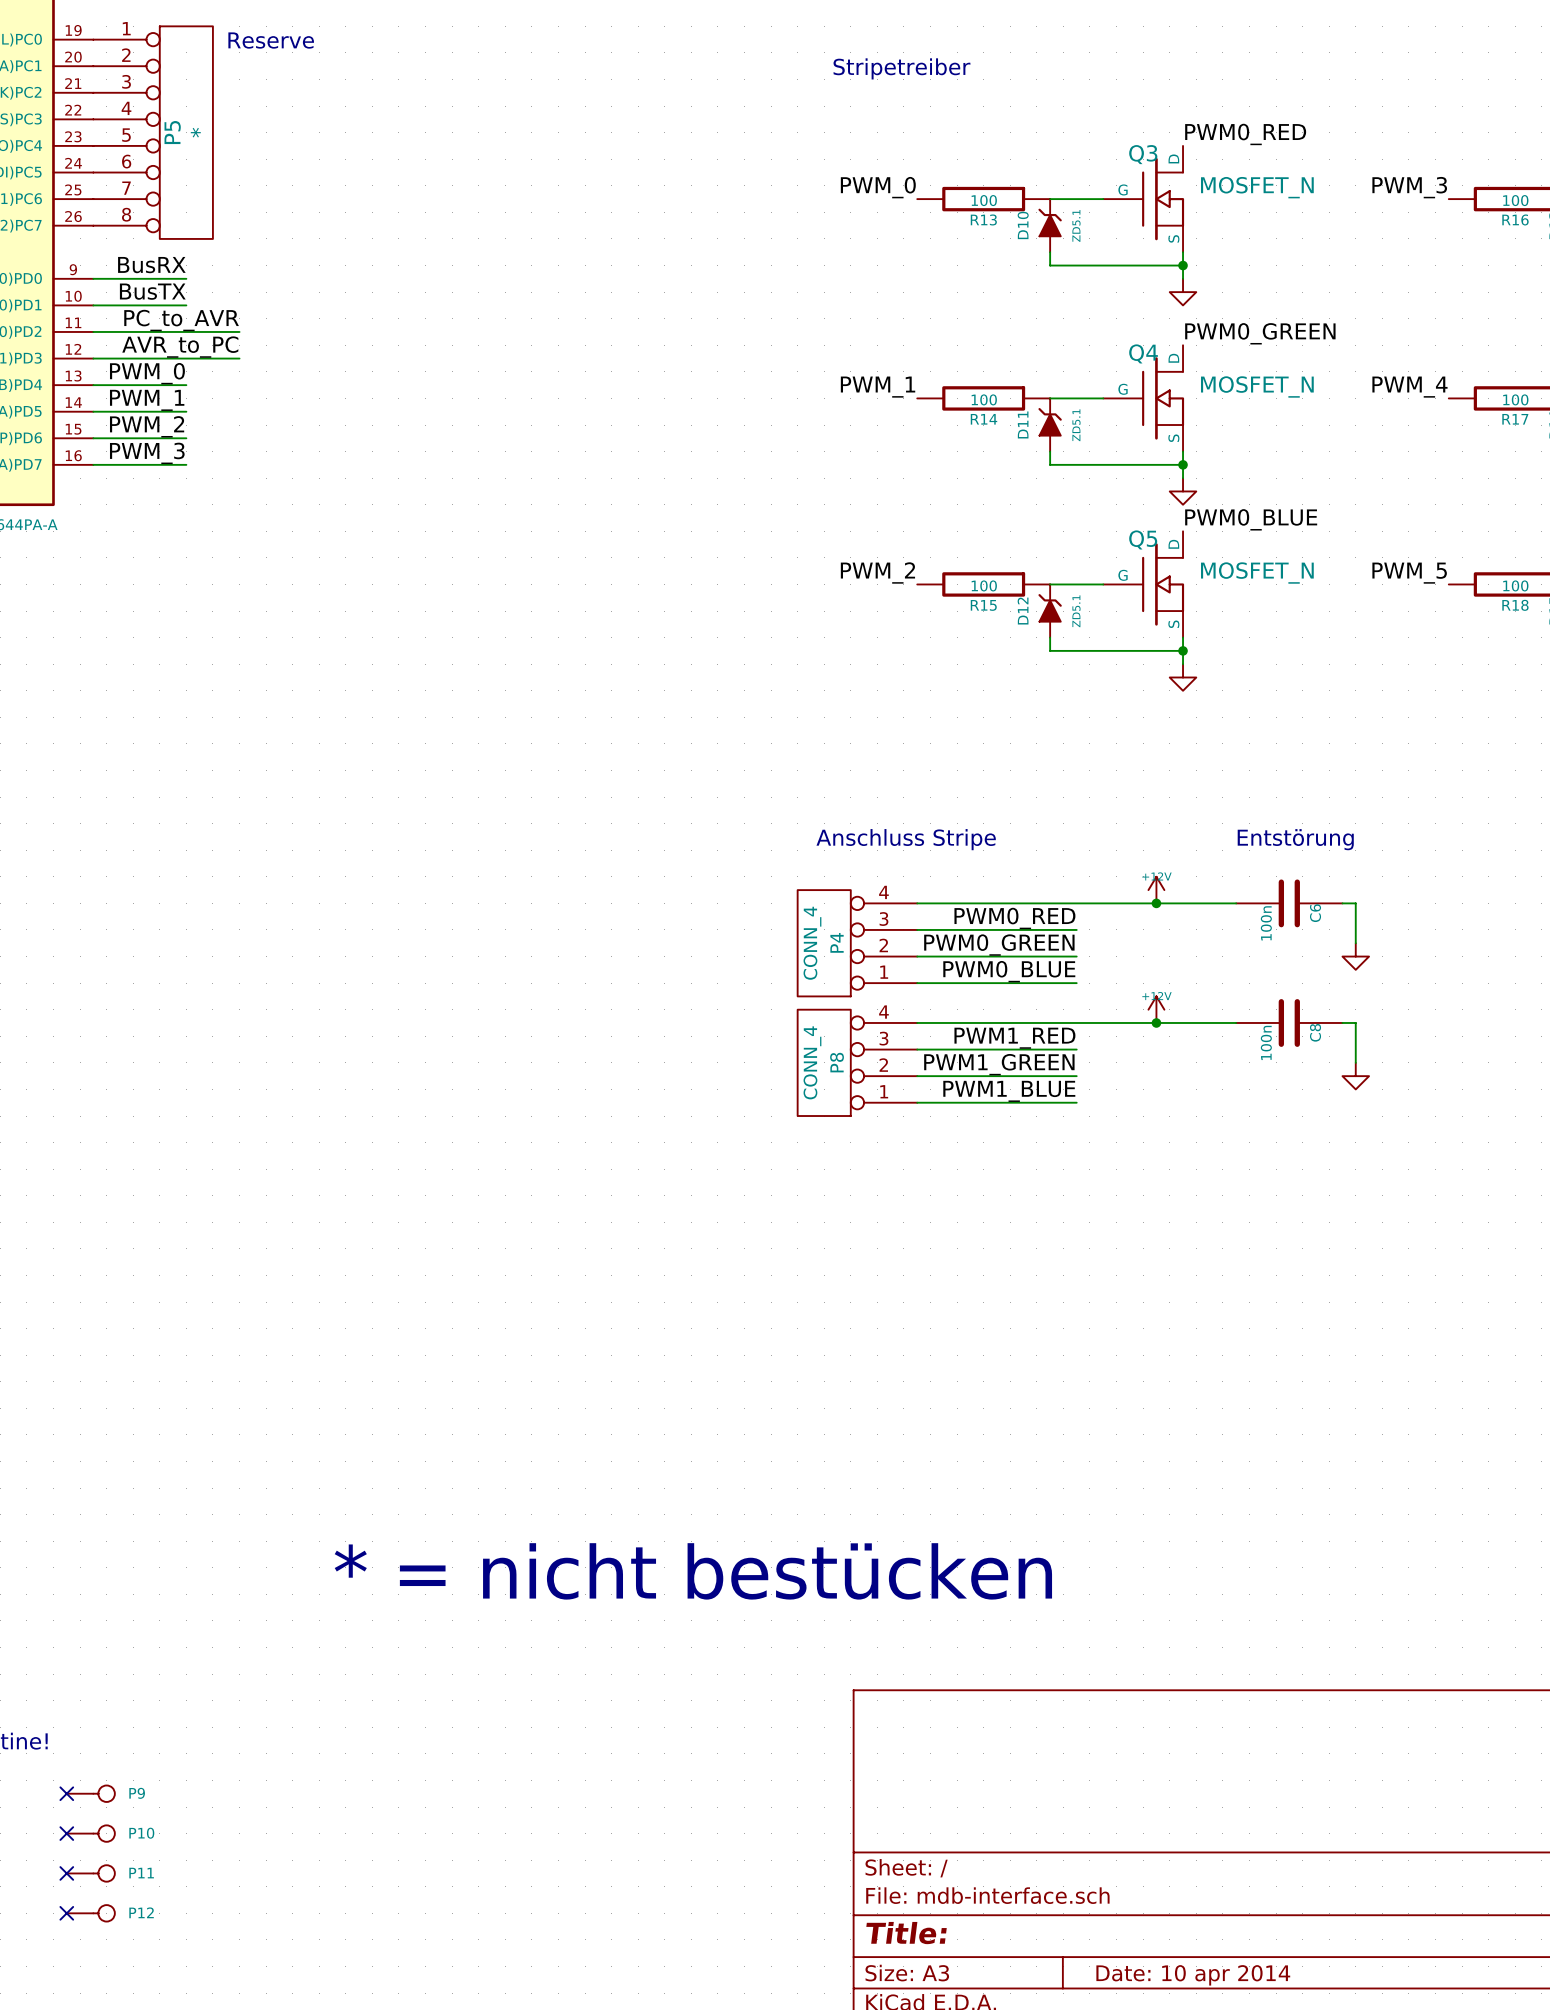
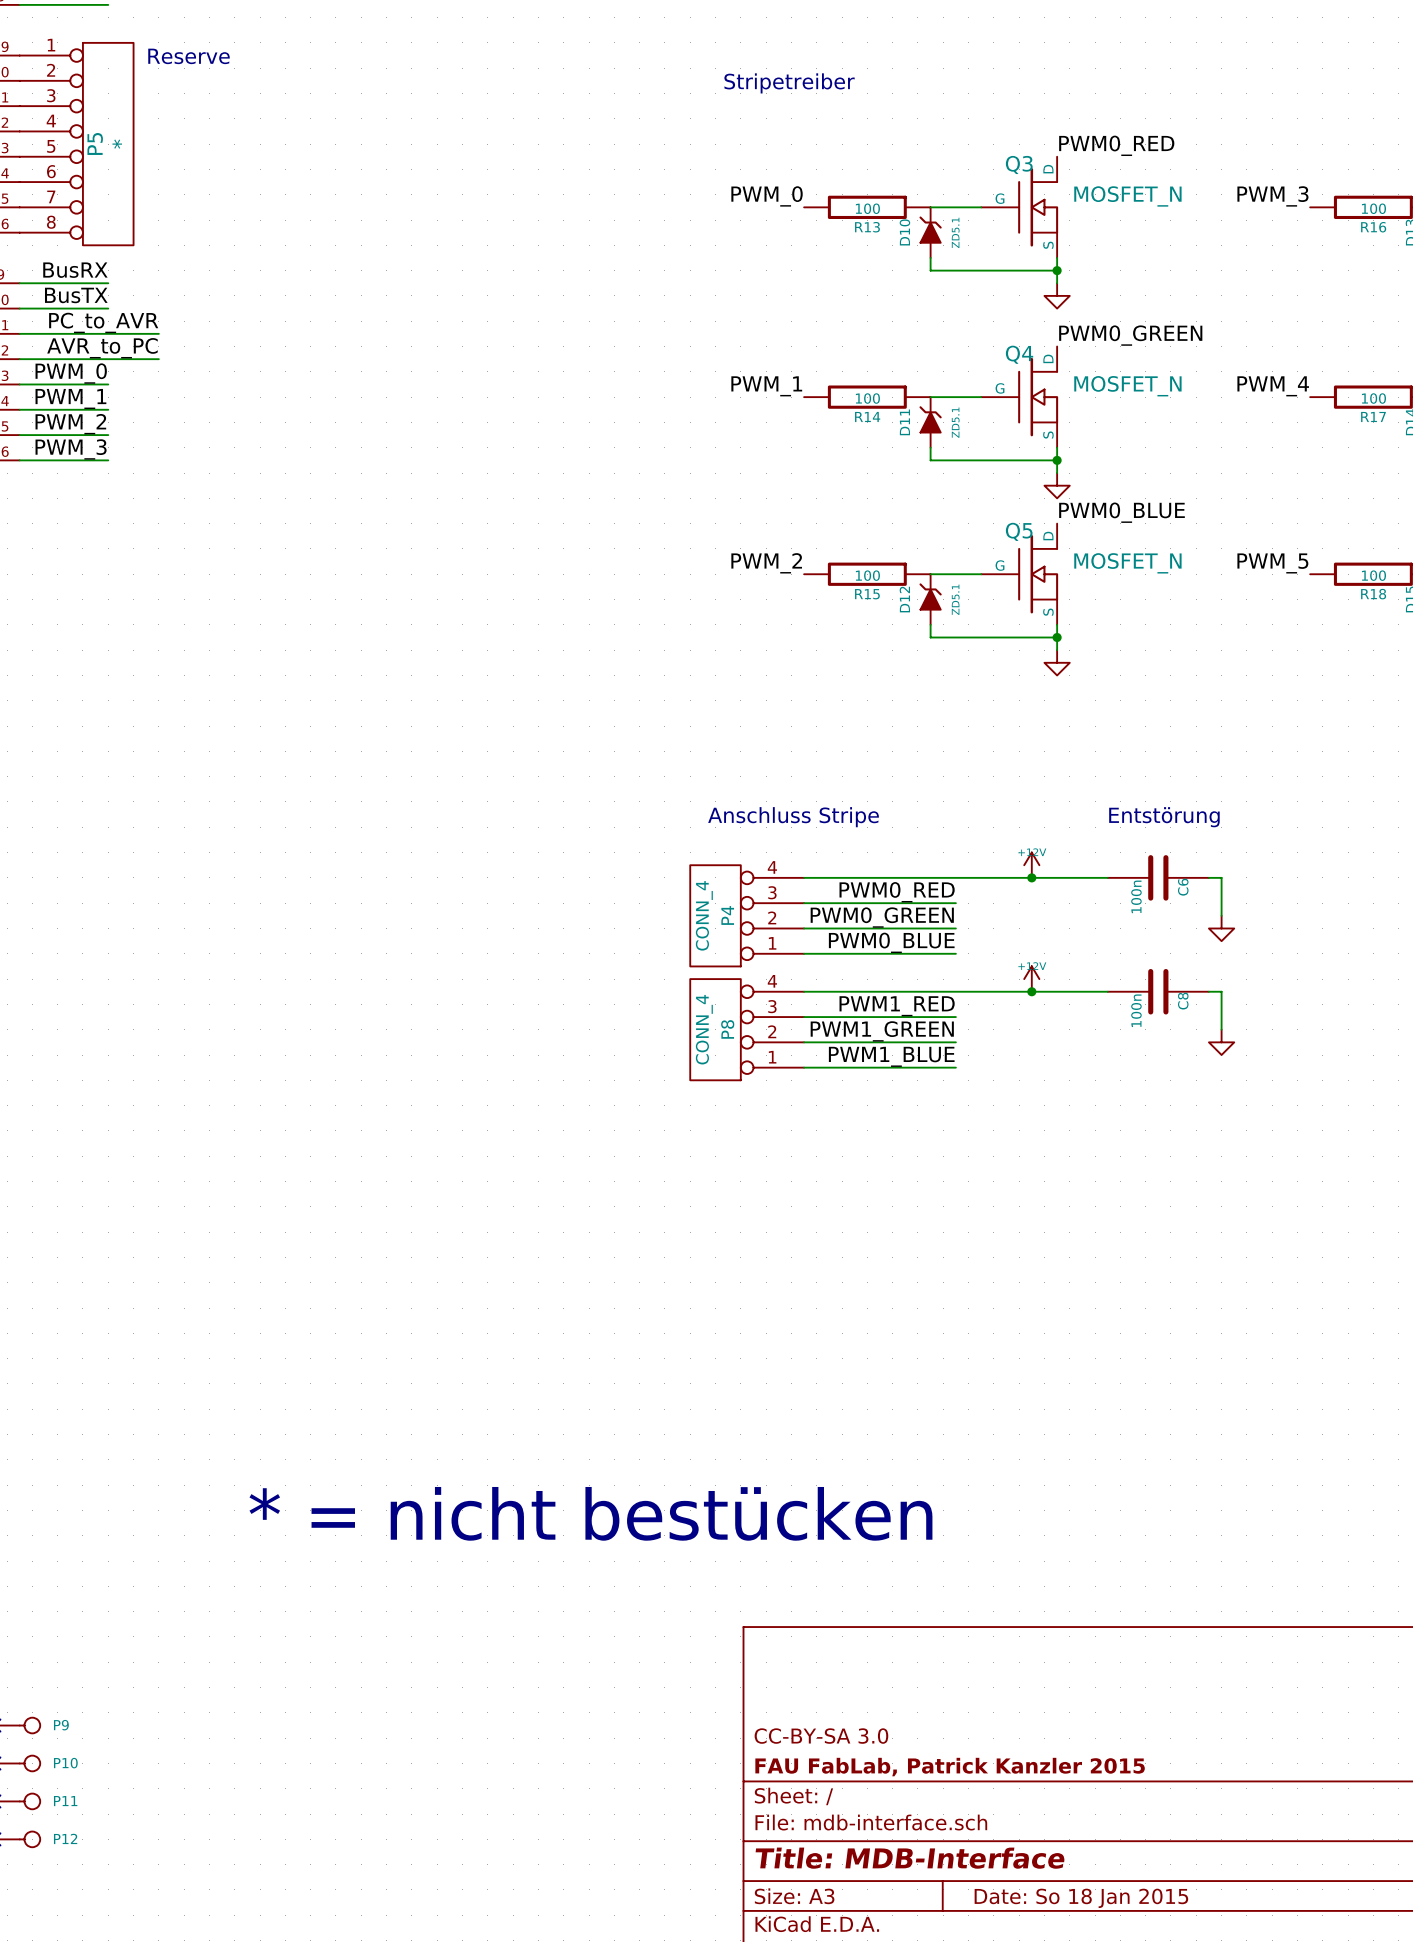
title block: none -> CC-BY-SA 3.0 (821, 1736)
title block: none -> FAU FabLab, Patrick Kanzler 2015 (950, 1767)
title block: Title: (906, 1933) -> Title: MDB-Interface (910, 1858)
title block: Date: 10 apr 2014 (1193, 1975) -> Date: So 18 Jan 2015 (1081, 1898)

